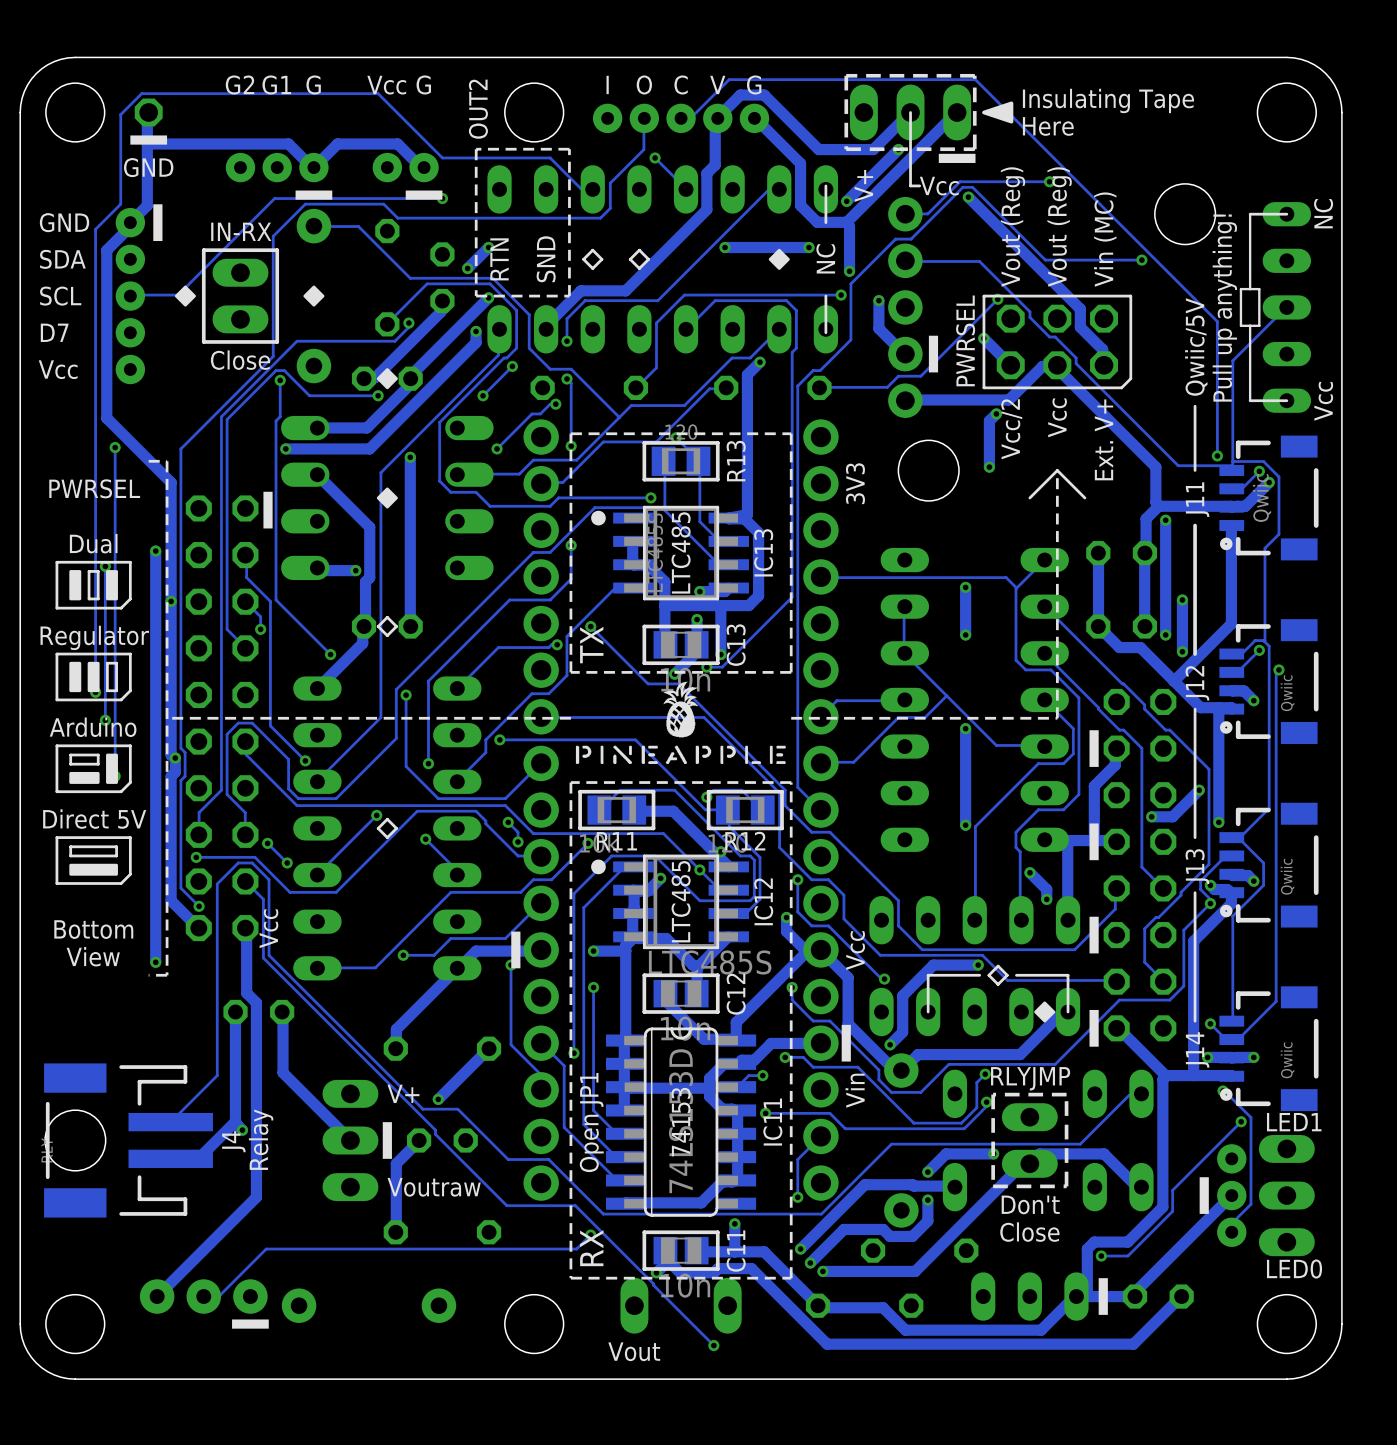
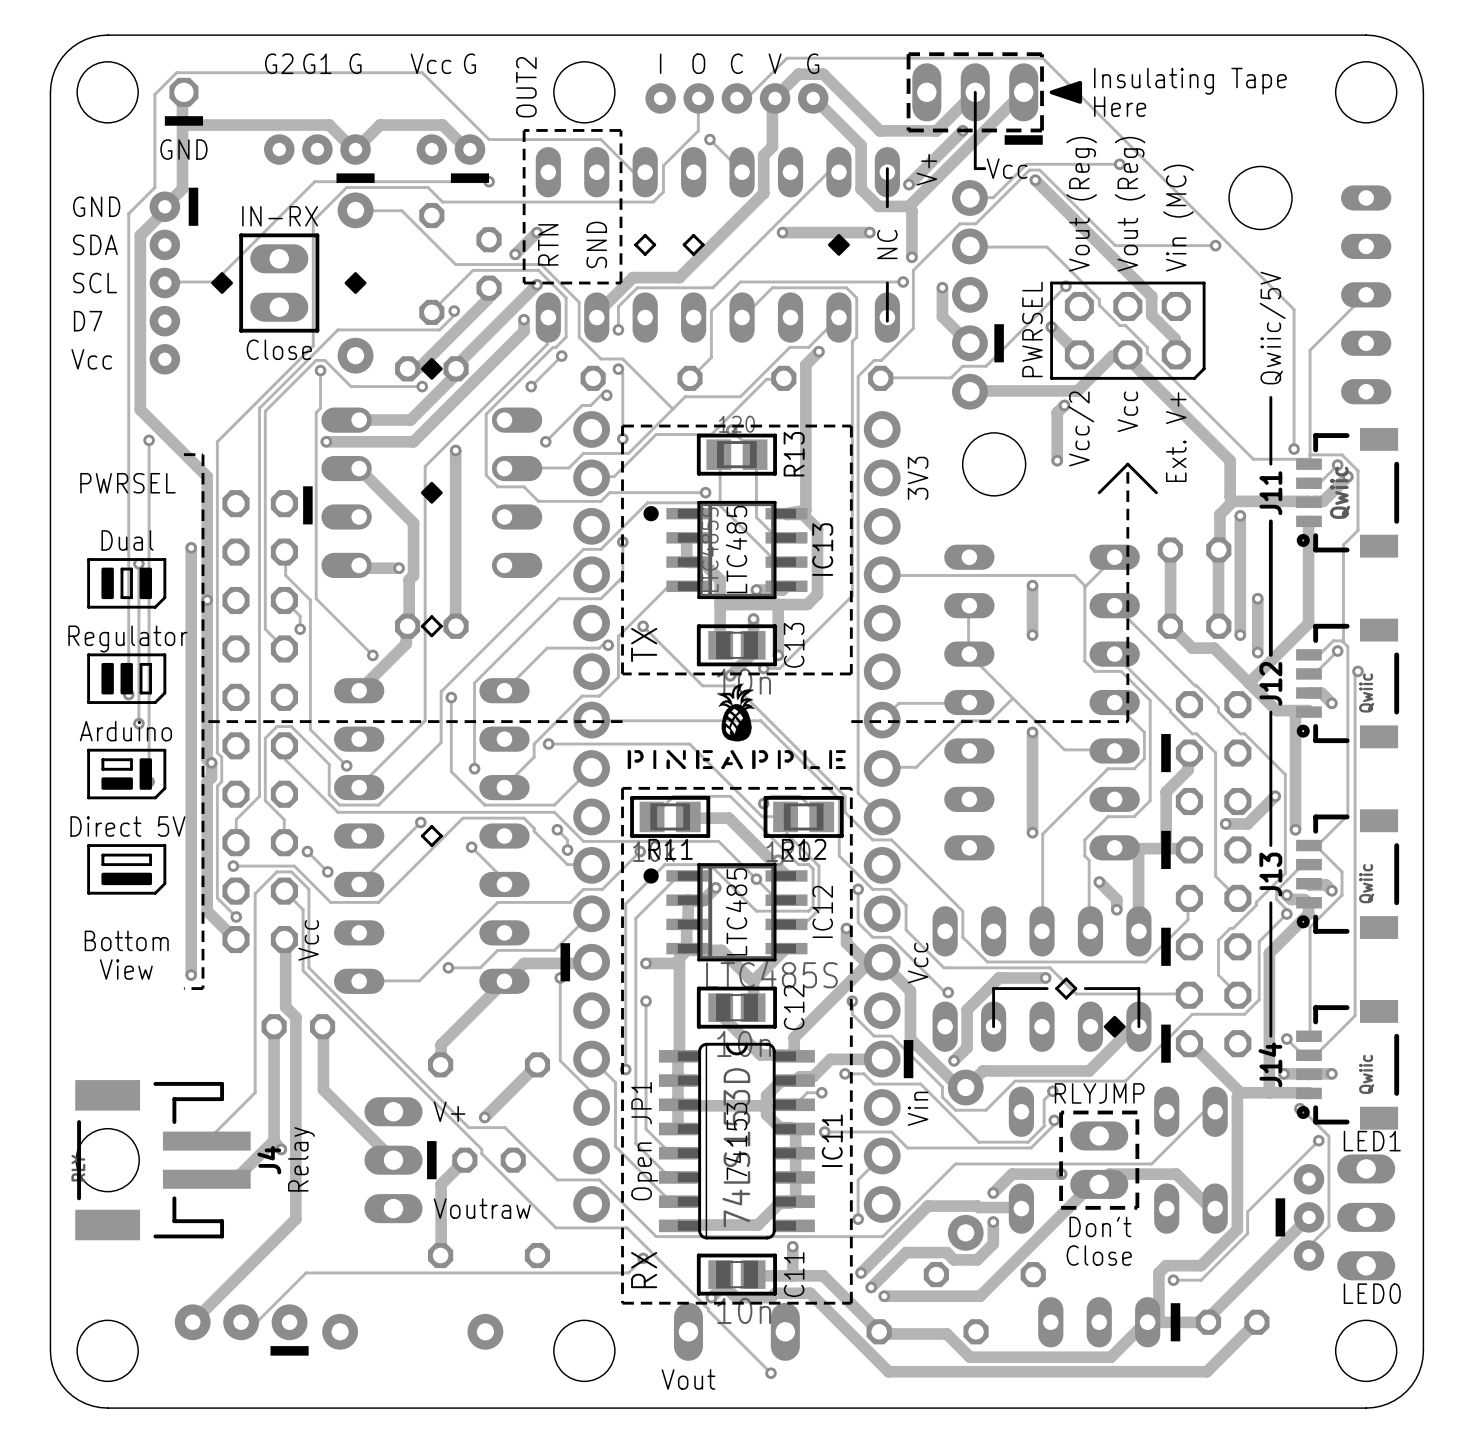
text: NC (1323, 213) -> none
line: (1286, 214) (1250, 214) (1250, 289) -> none
line: (1259, 289) (1240, 289) (1240, 325) (1259, 325) (1259, 289) -> none
text: Pull up anything! (1224, 308) -> none
line: (1250, 325) (1250, 400) (1286, 400) -> none
text: Vcc (1323, 401) -> none

